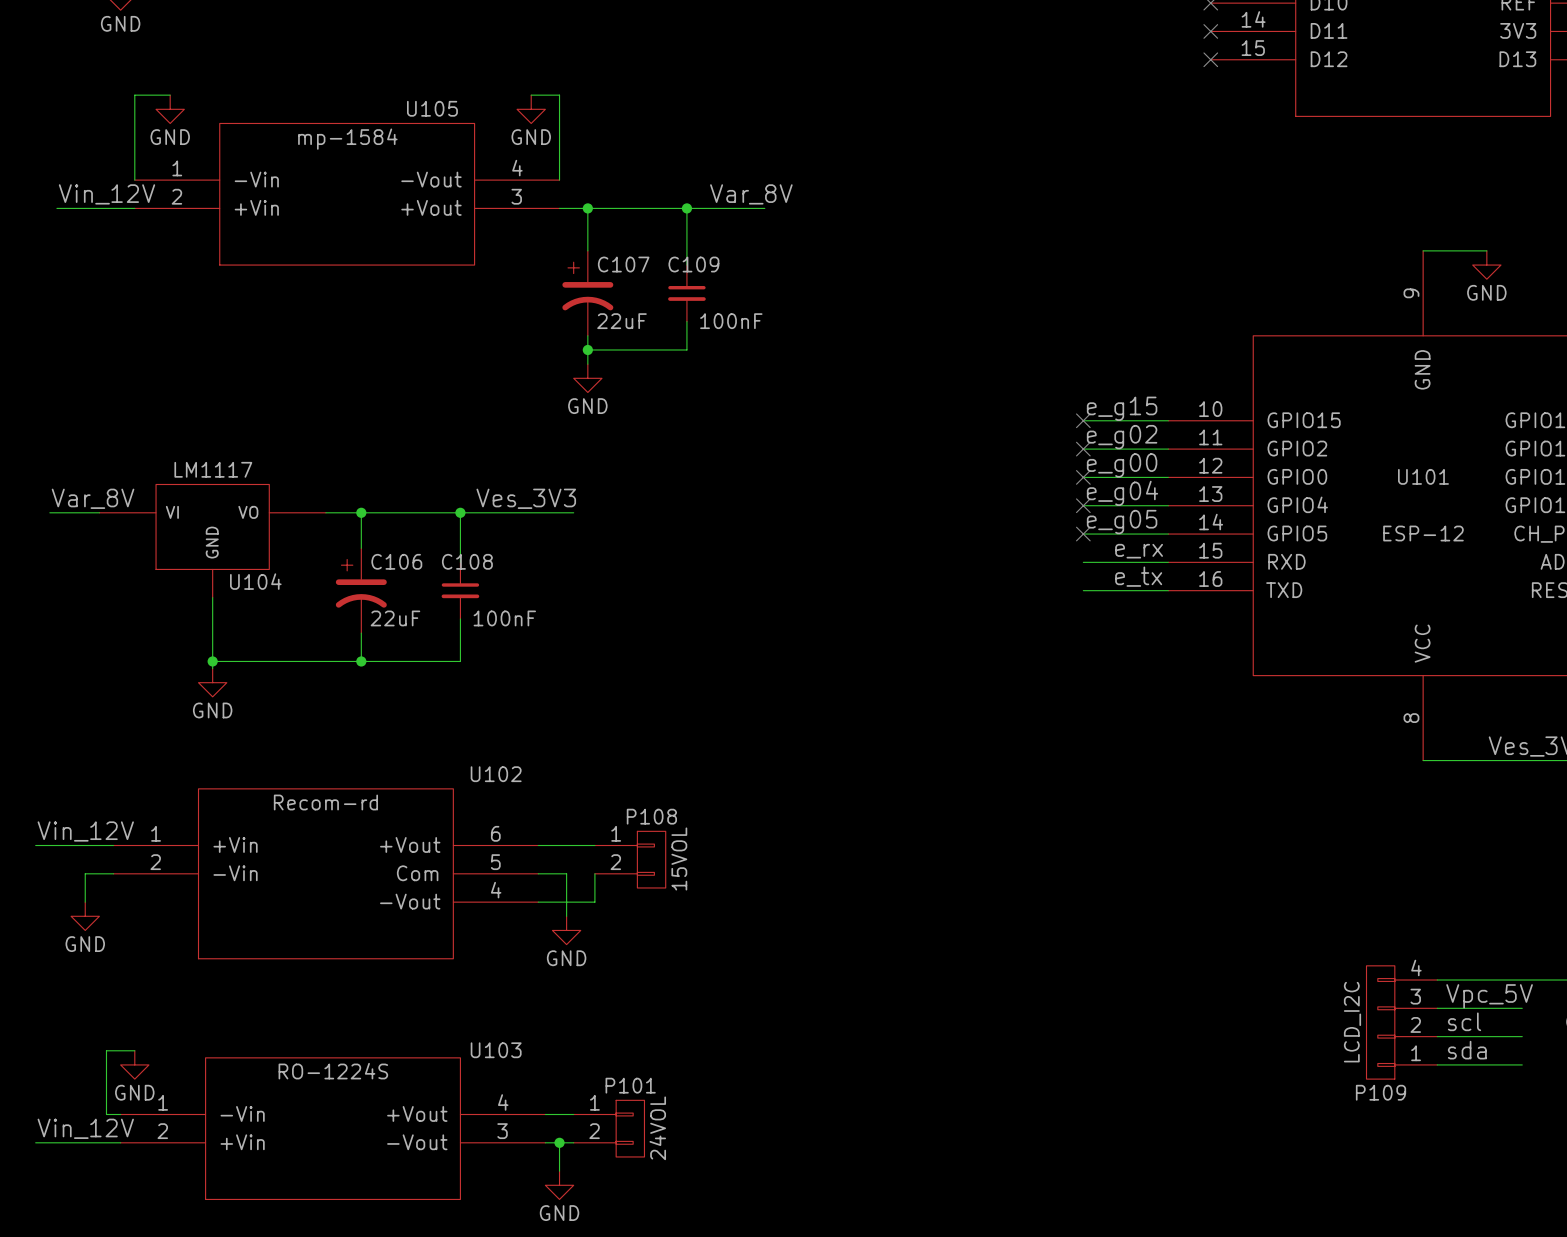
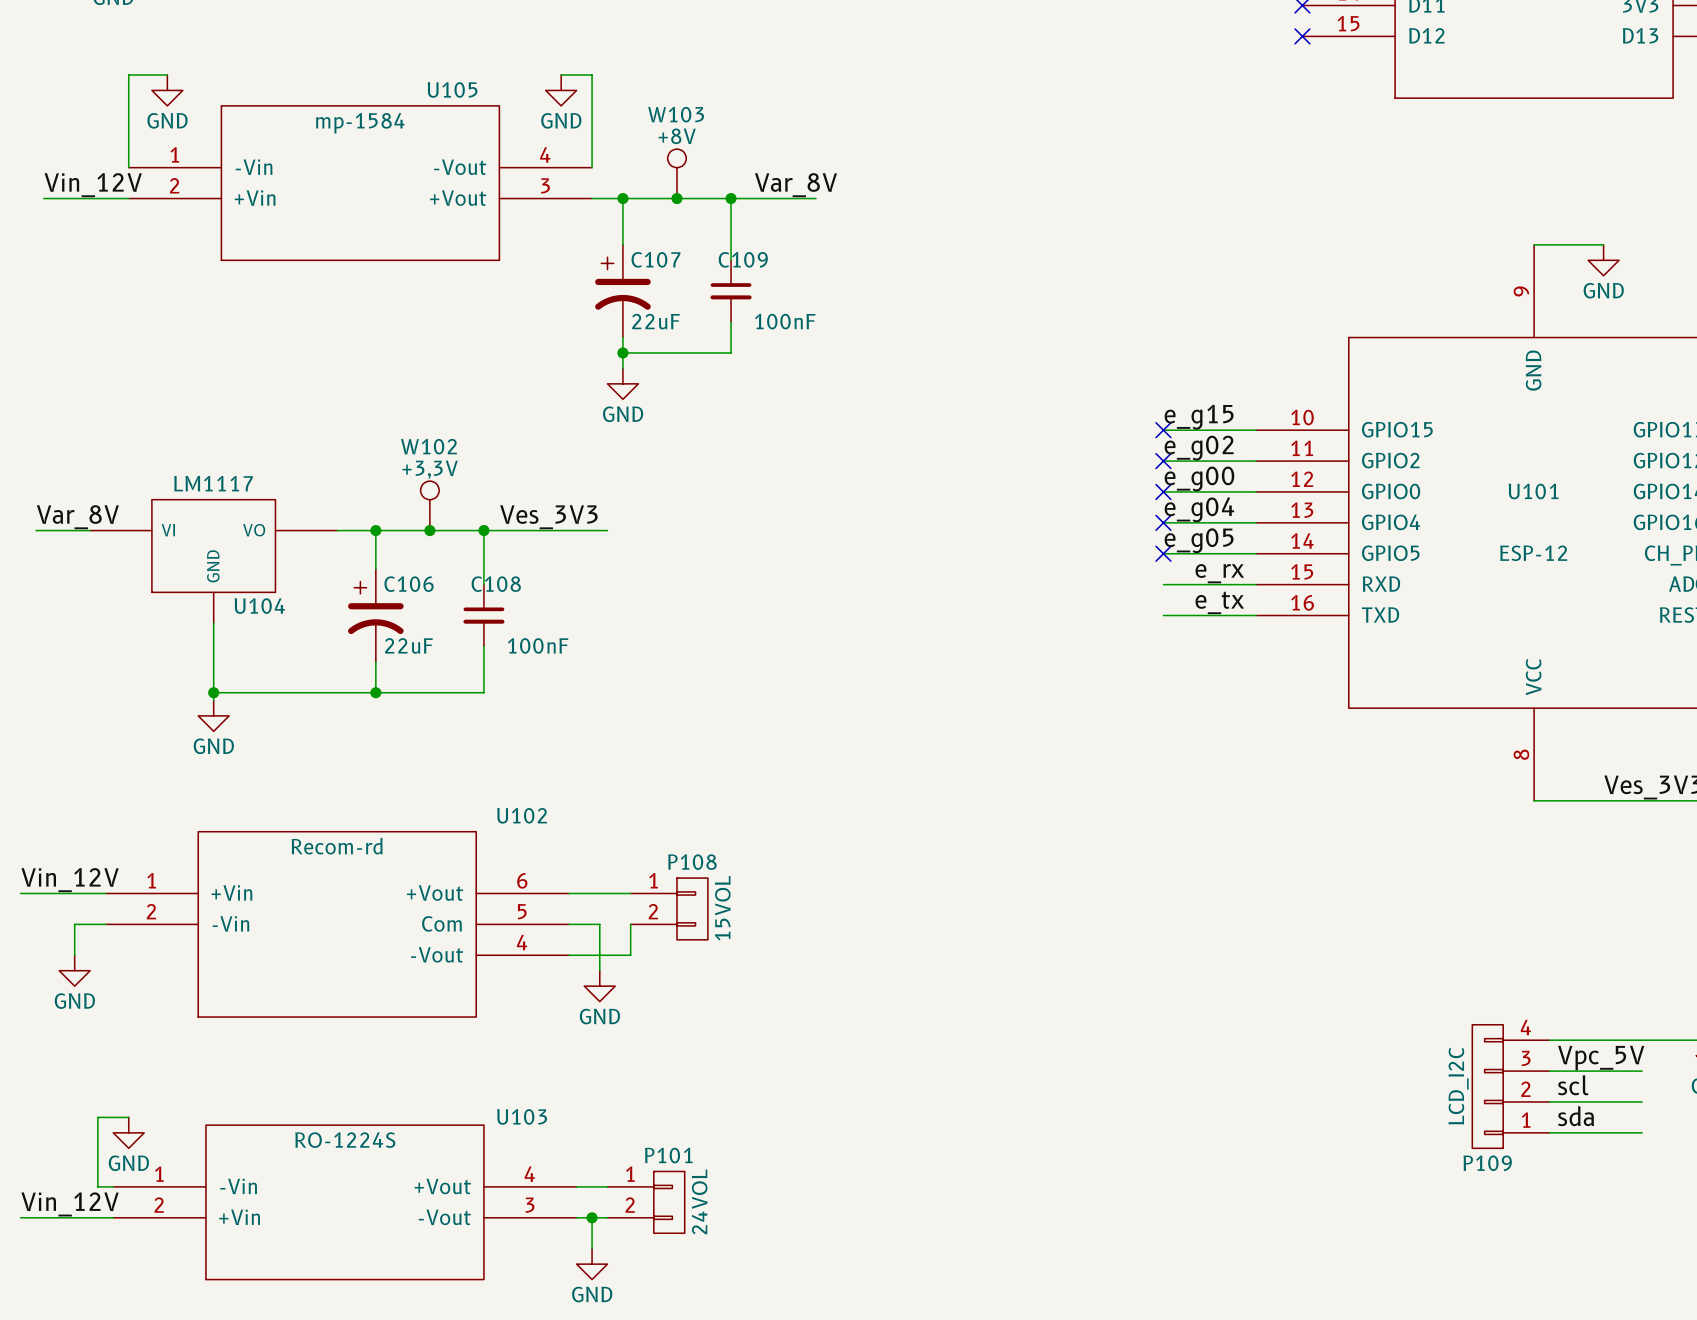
W103: none -> +8V (676, 173)
junction: none -> (676, 198)
W102: none -> +3,3V (429, 505)
junction: none -> (429, 530)

